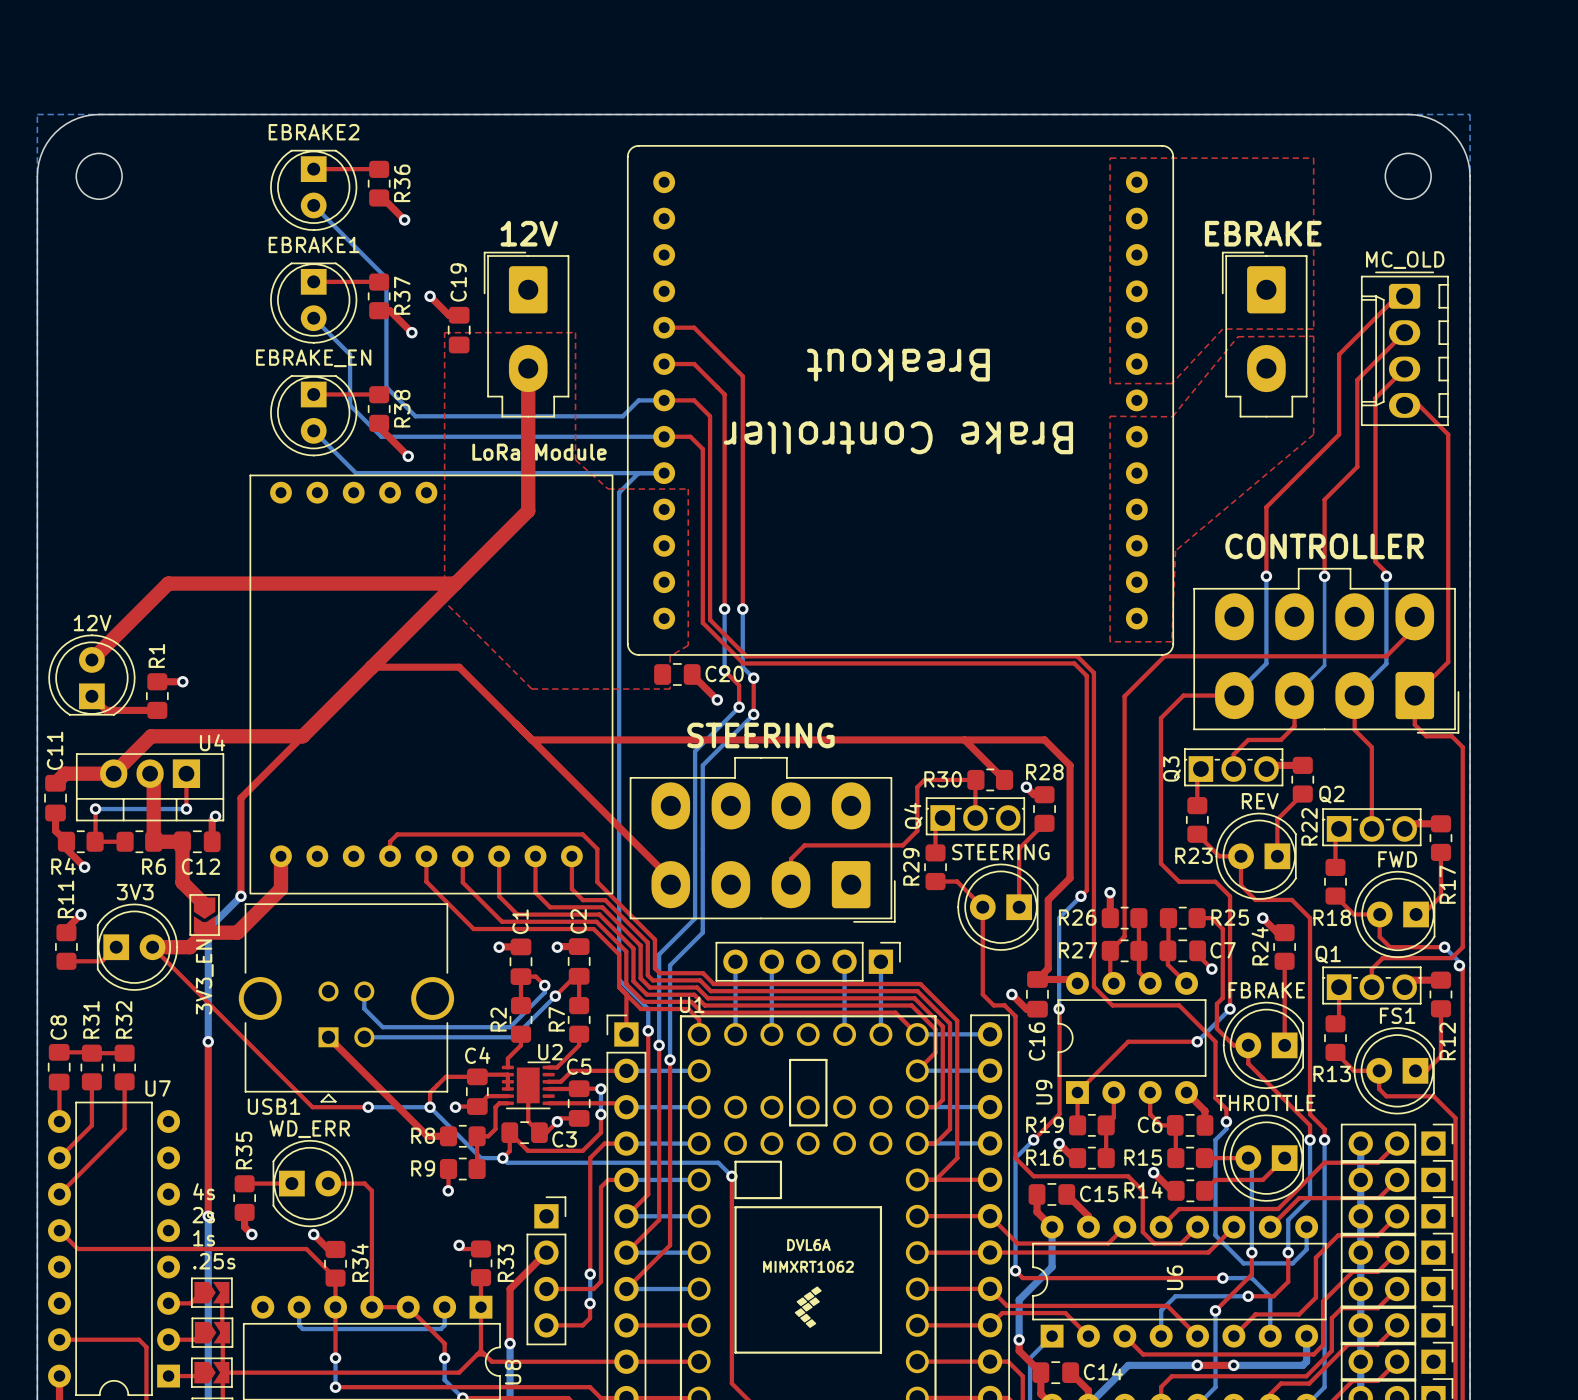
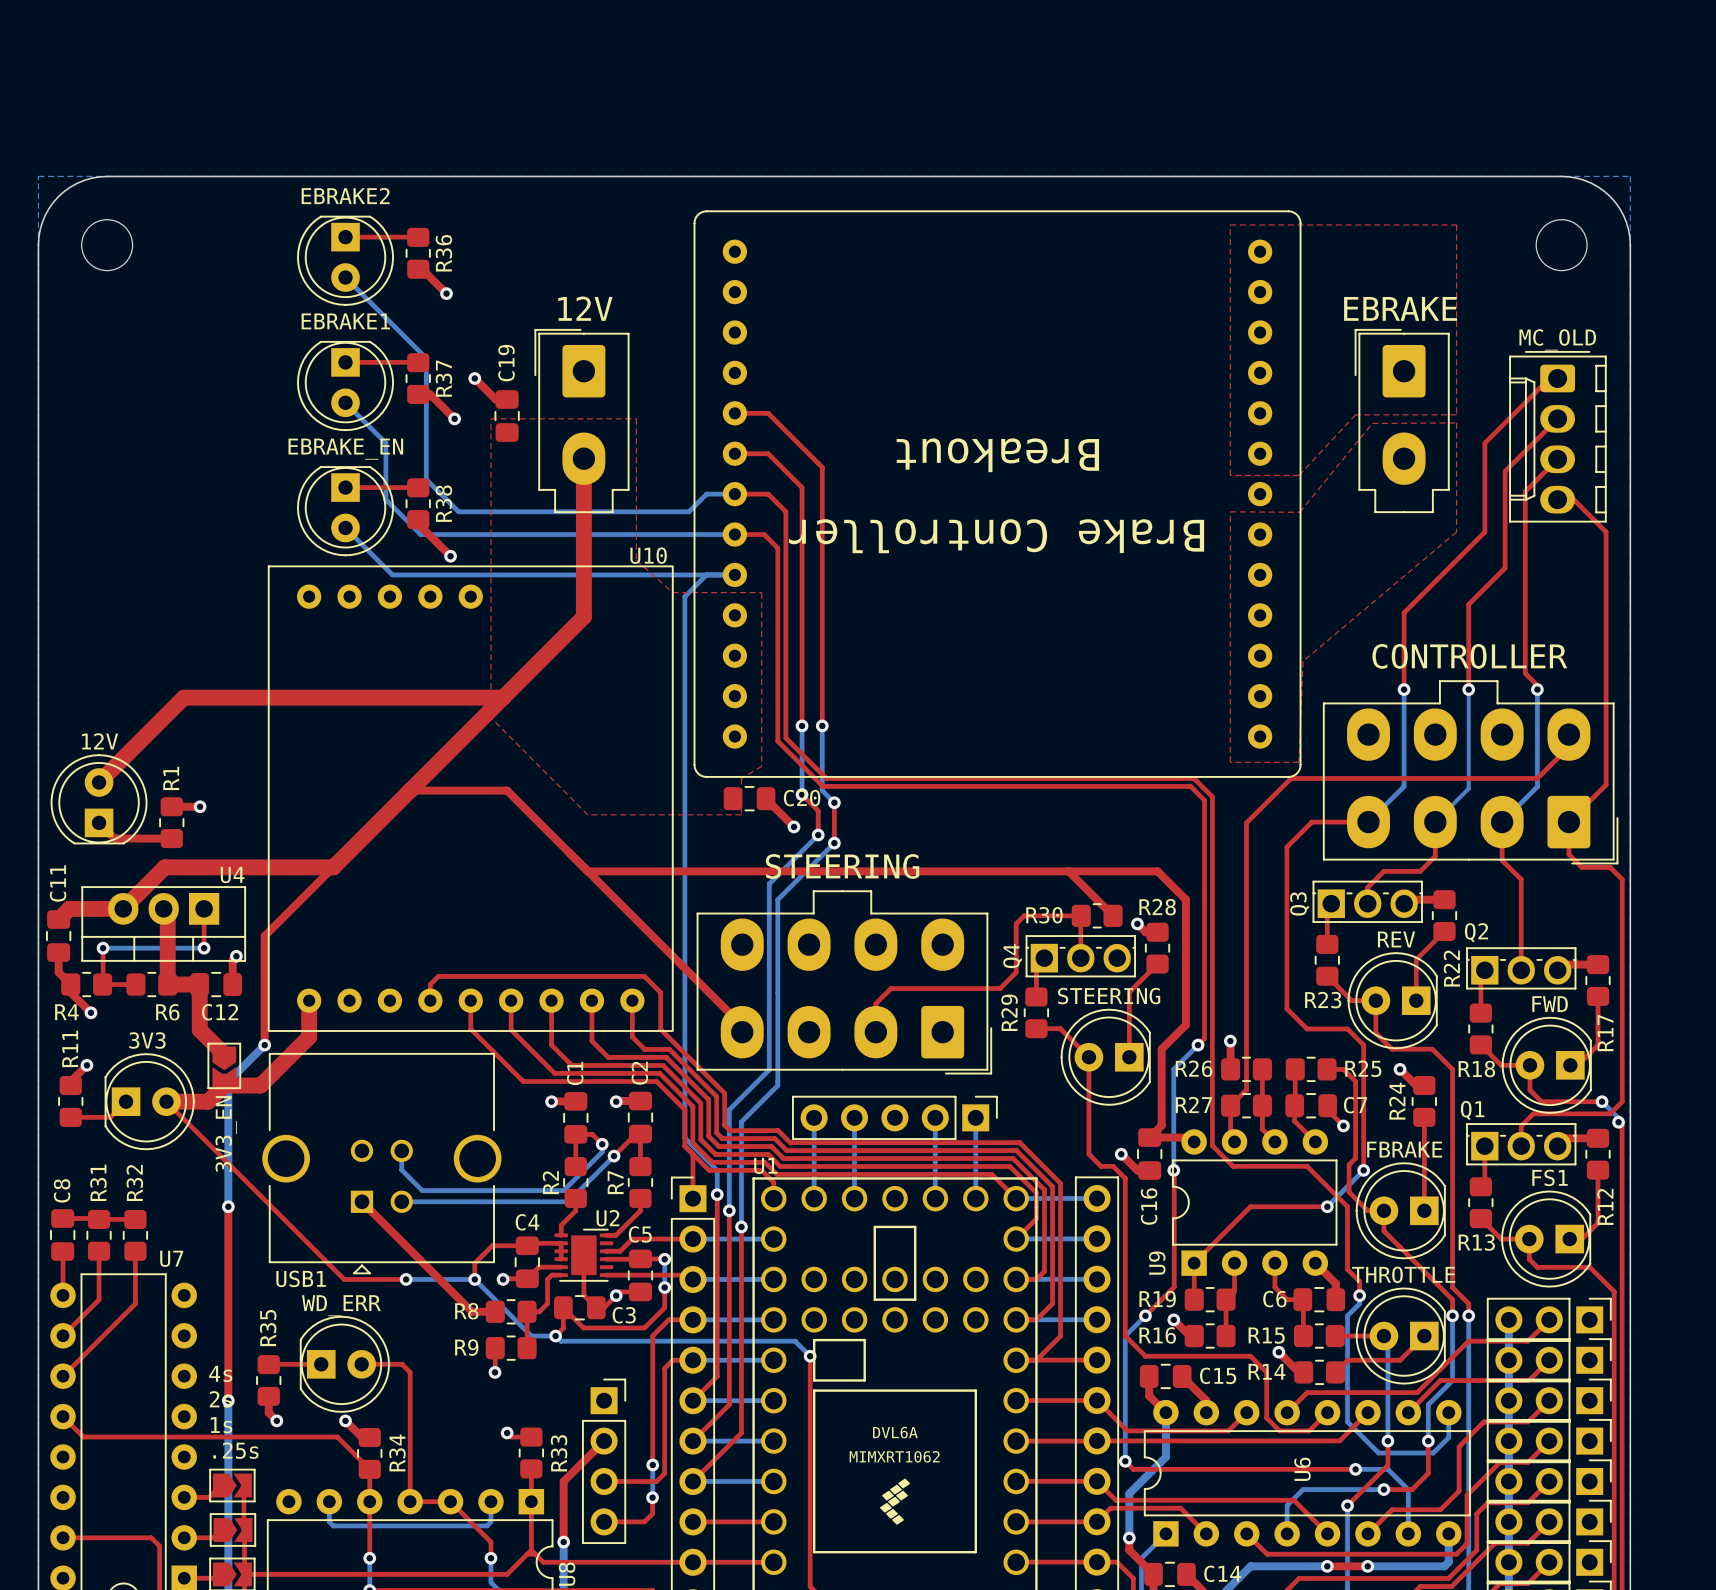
text: LoRa Module (539, 452) -> none
U10: none -> (470, 798)
part: (431, 684) -> none

